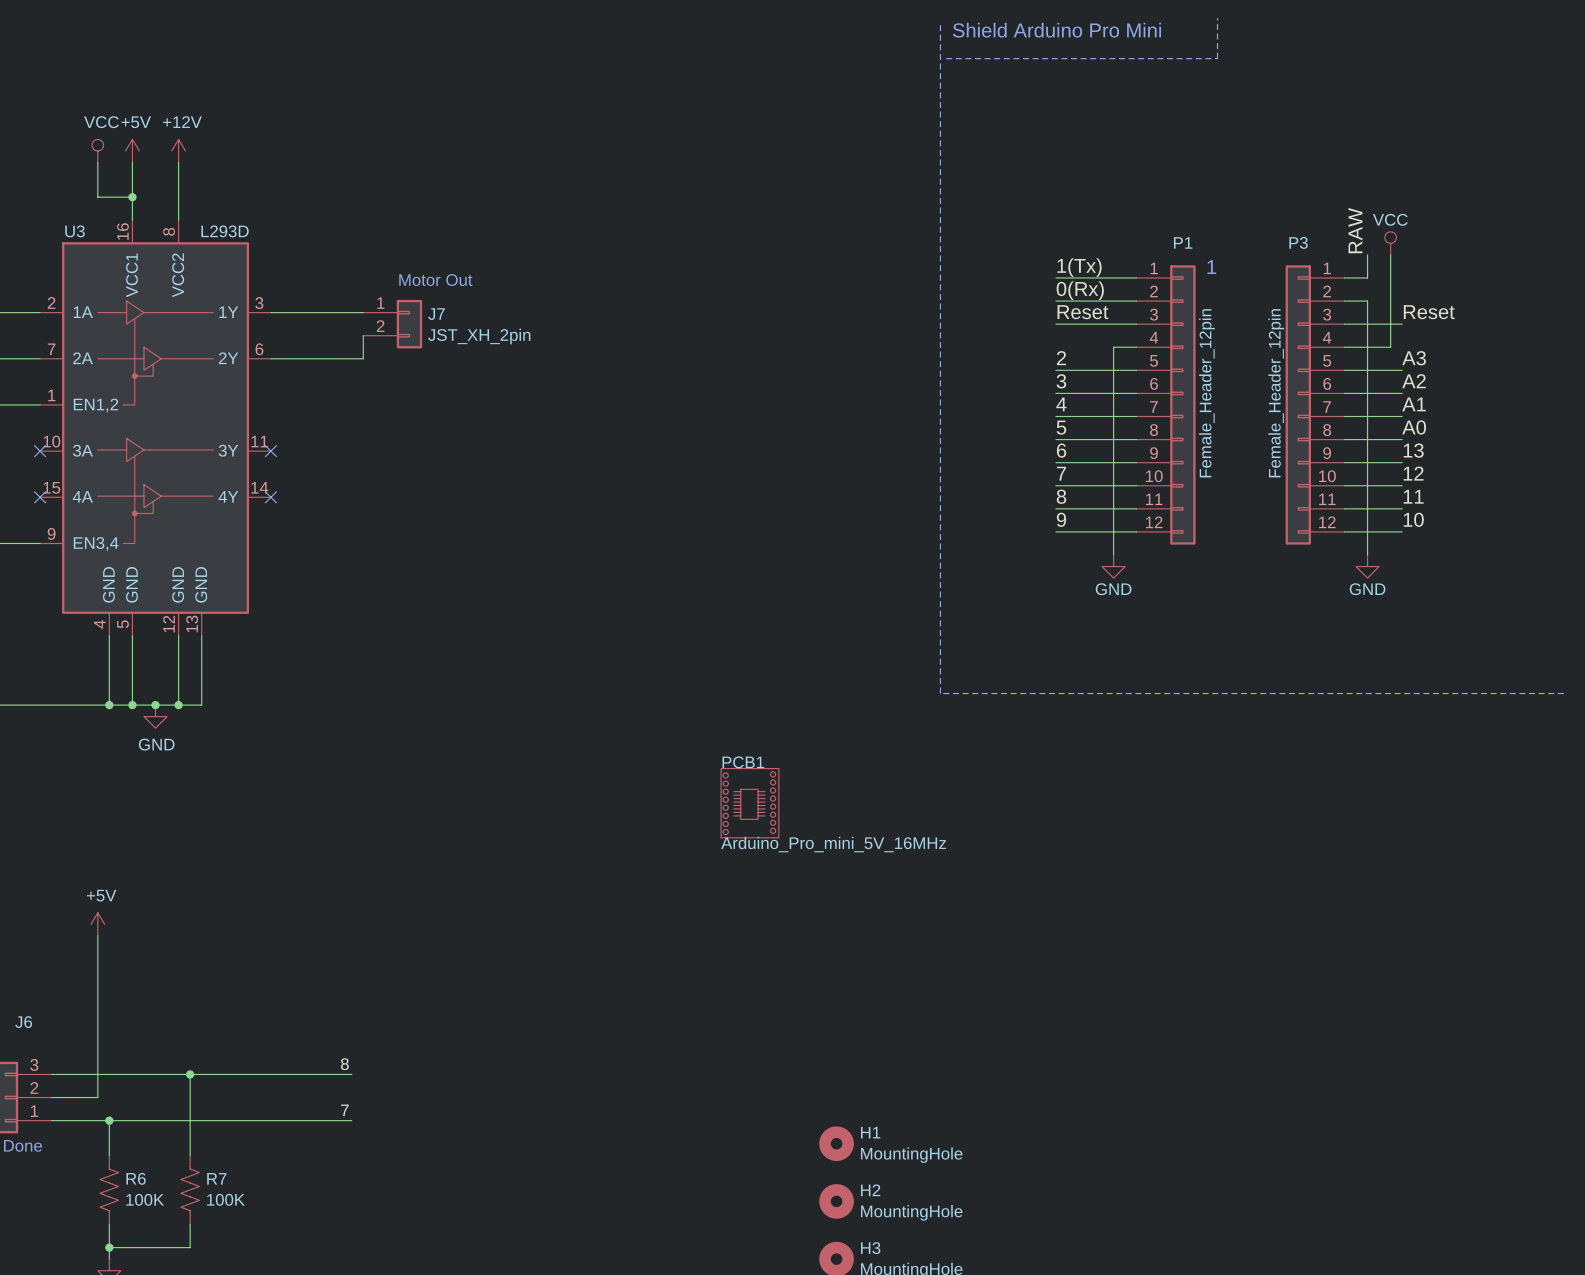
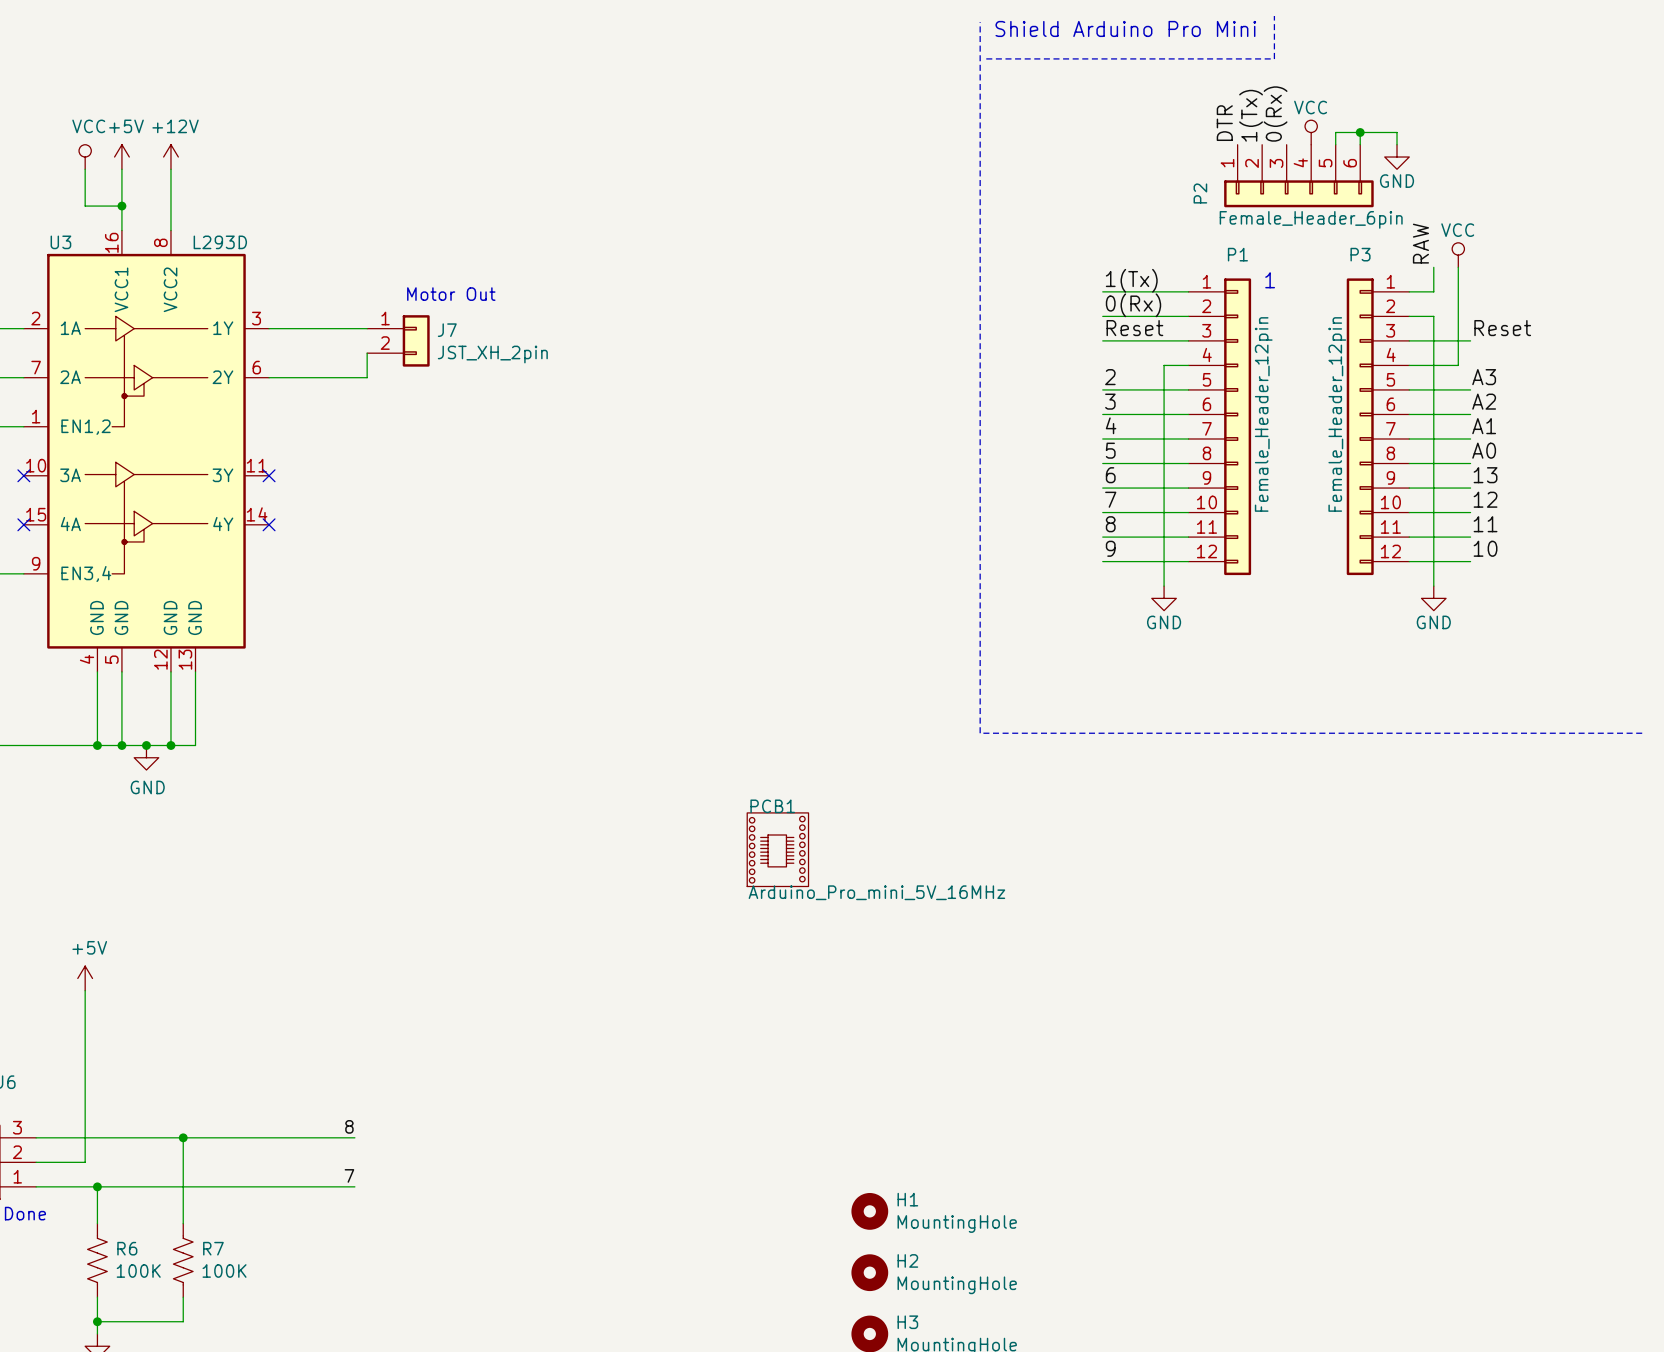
label: none -> 1(Tx) (1251, 115)
label: none -> 0(Rx) (1275, 114)
label: none -> DTR (1224, 123)
power symbol: none -> VCC (1311, 132)
wire: none -> (1360, 132) (1360, 144)
junction: none -> (1360, 132)
wire: none -> (1335, 144) (1335, 132) (1397, 132) (1397, 144)
power symbol: none -> GND (1397, 157)
P2: none -> Female_Header_6pin (1298, 176)

